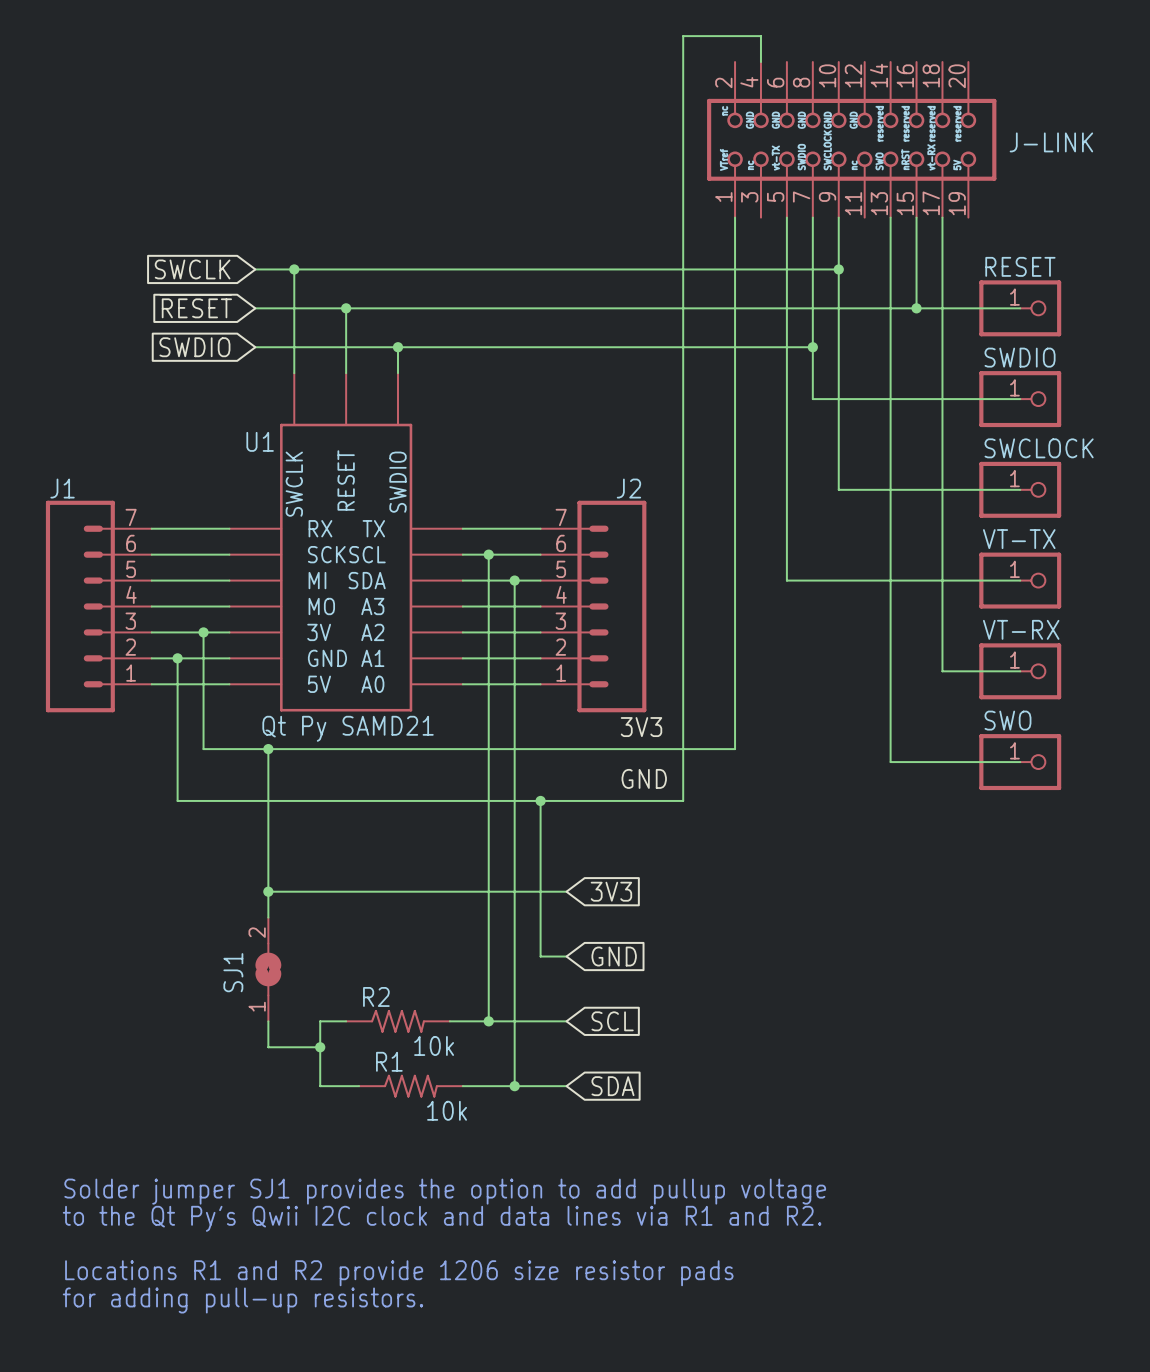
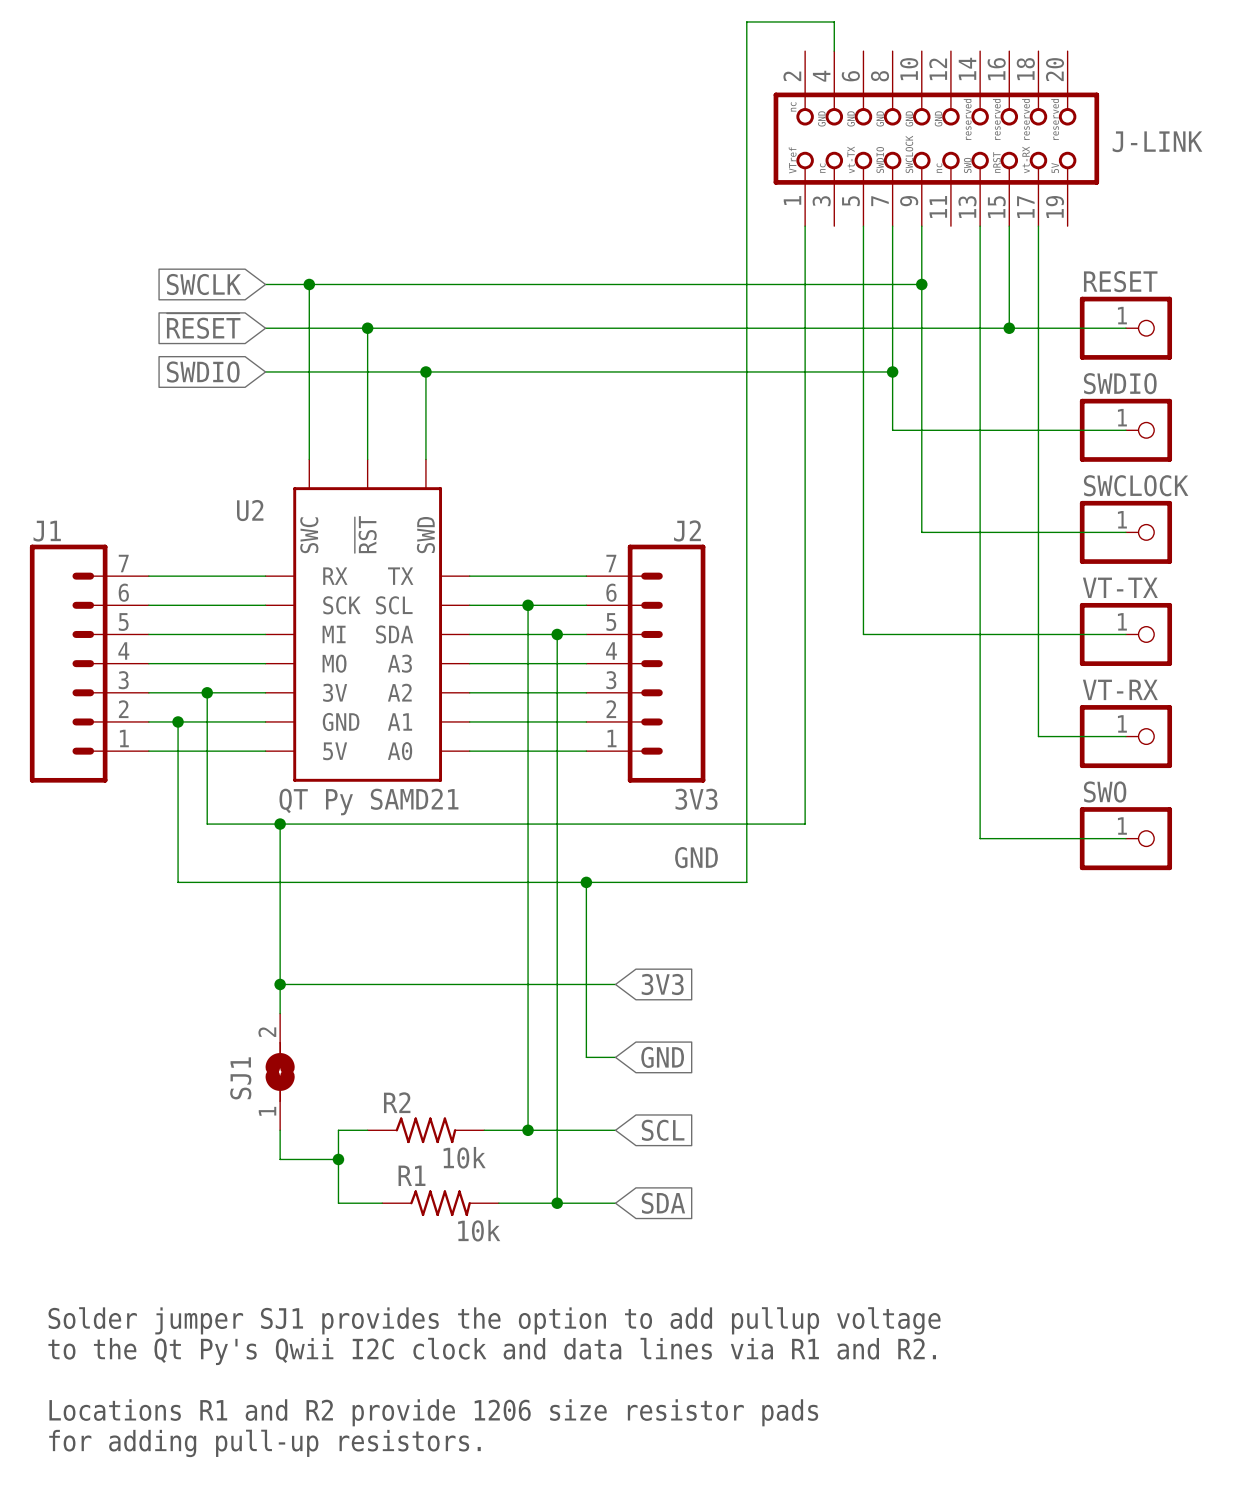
U1: Qt Py SAMD21 (346, 542) -> none
U2: none -> QT Py SAMD21 (367, 620)

